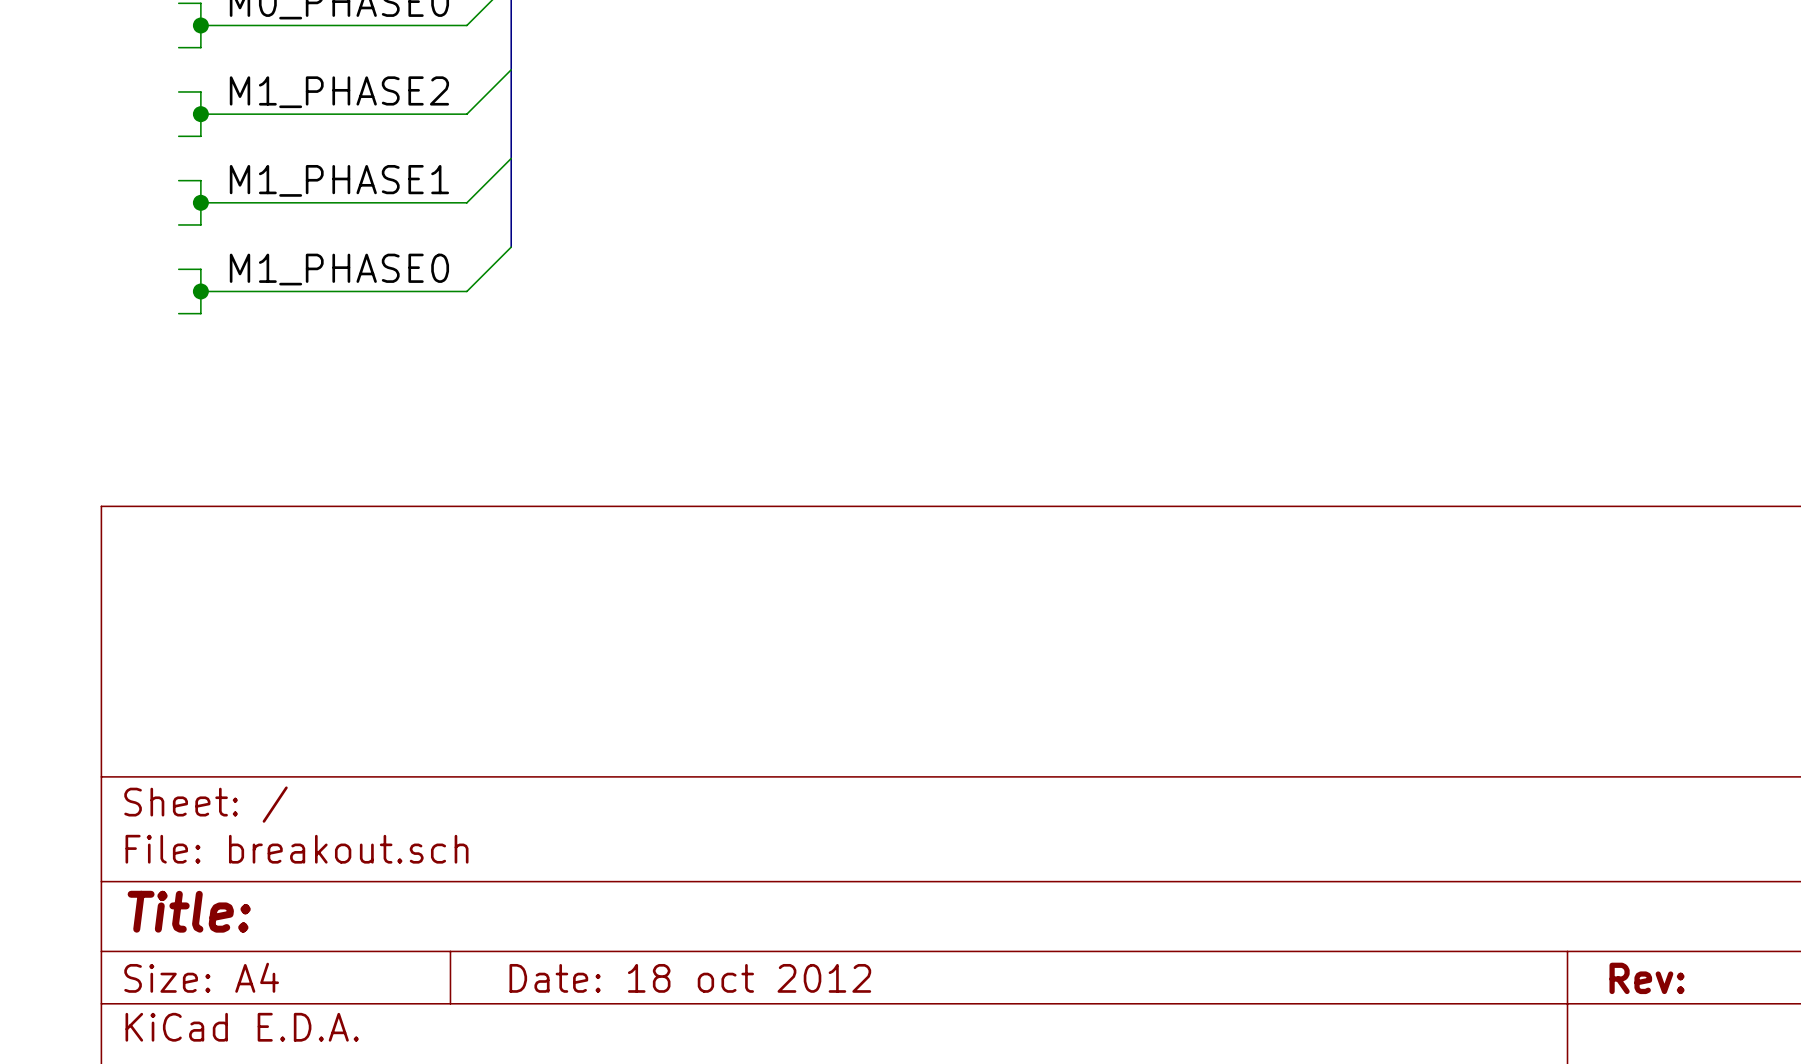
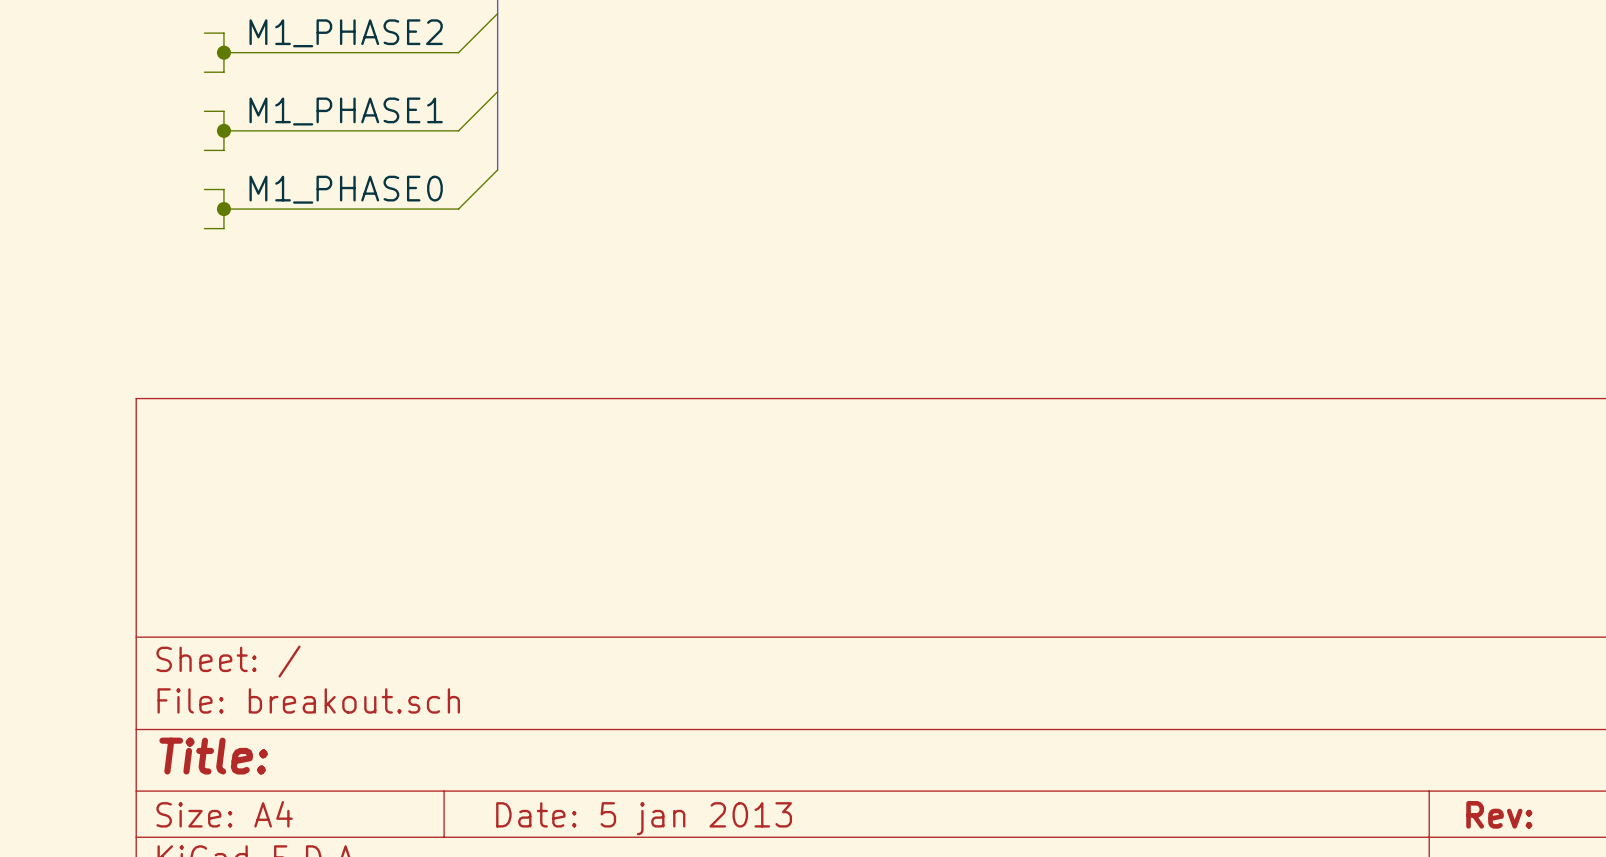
title block: Date: 18 oct 2012 (690, 978) -> Date: 5 jan 2013 (644, 818)

